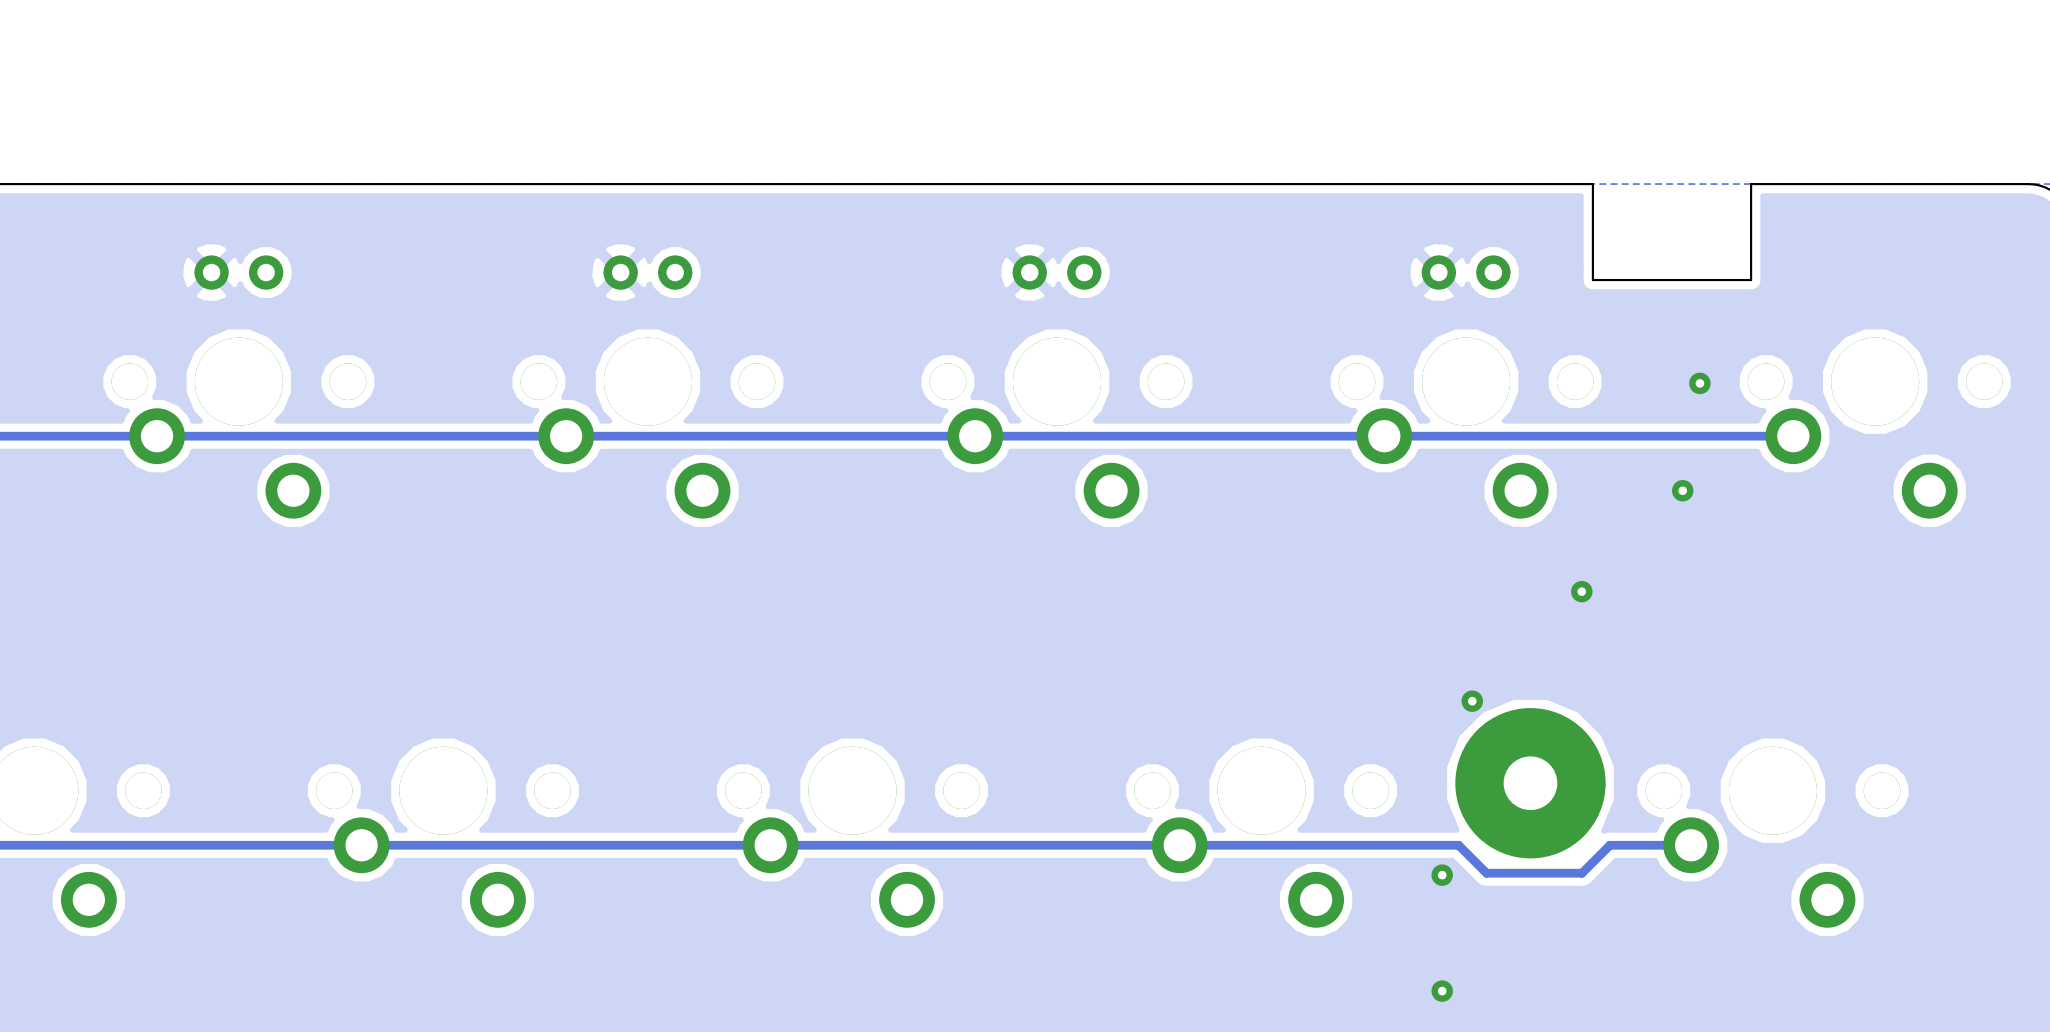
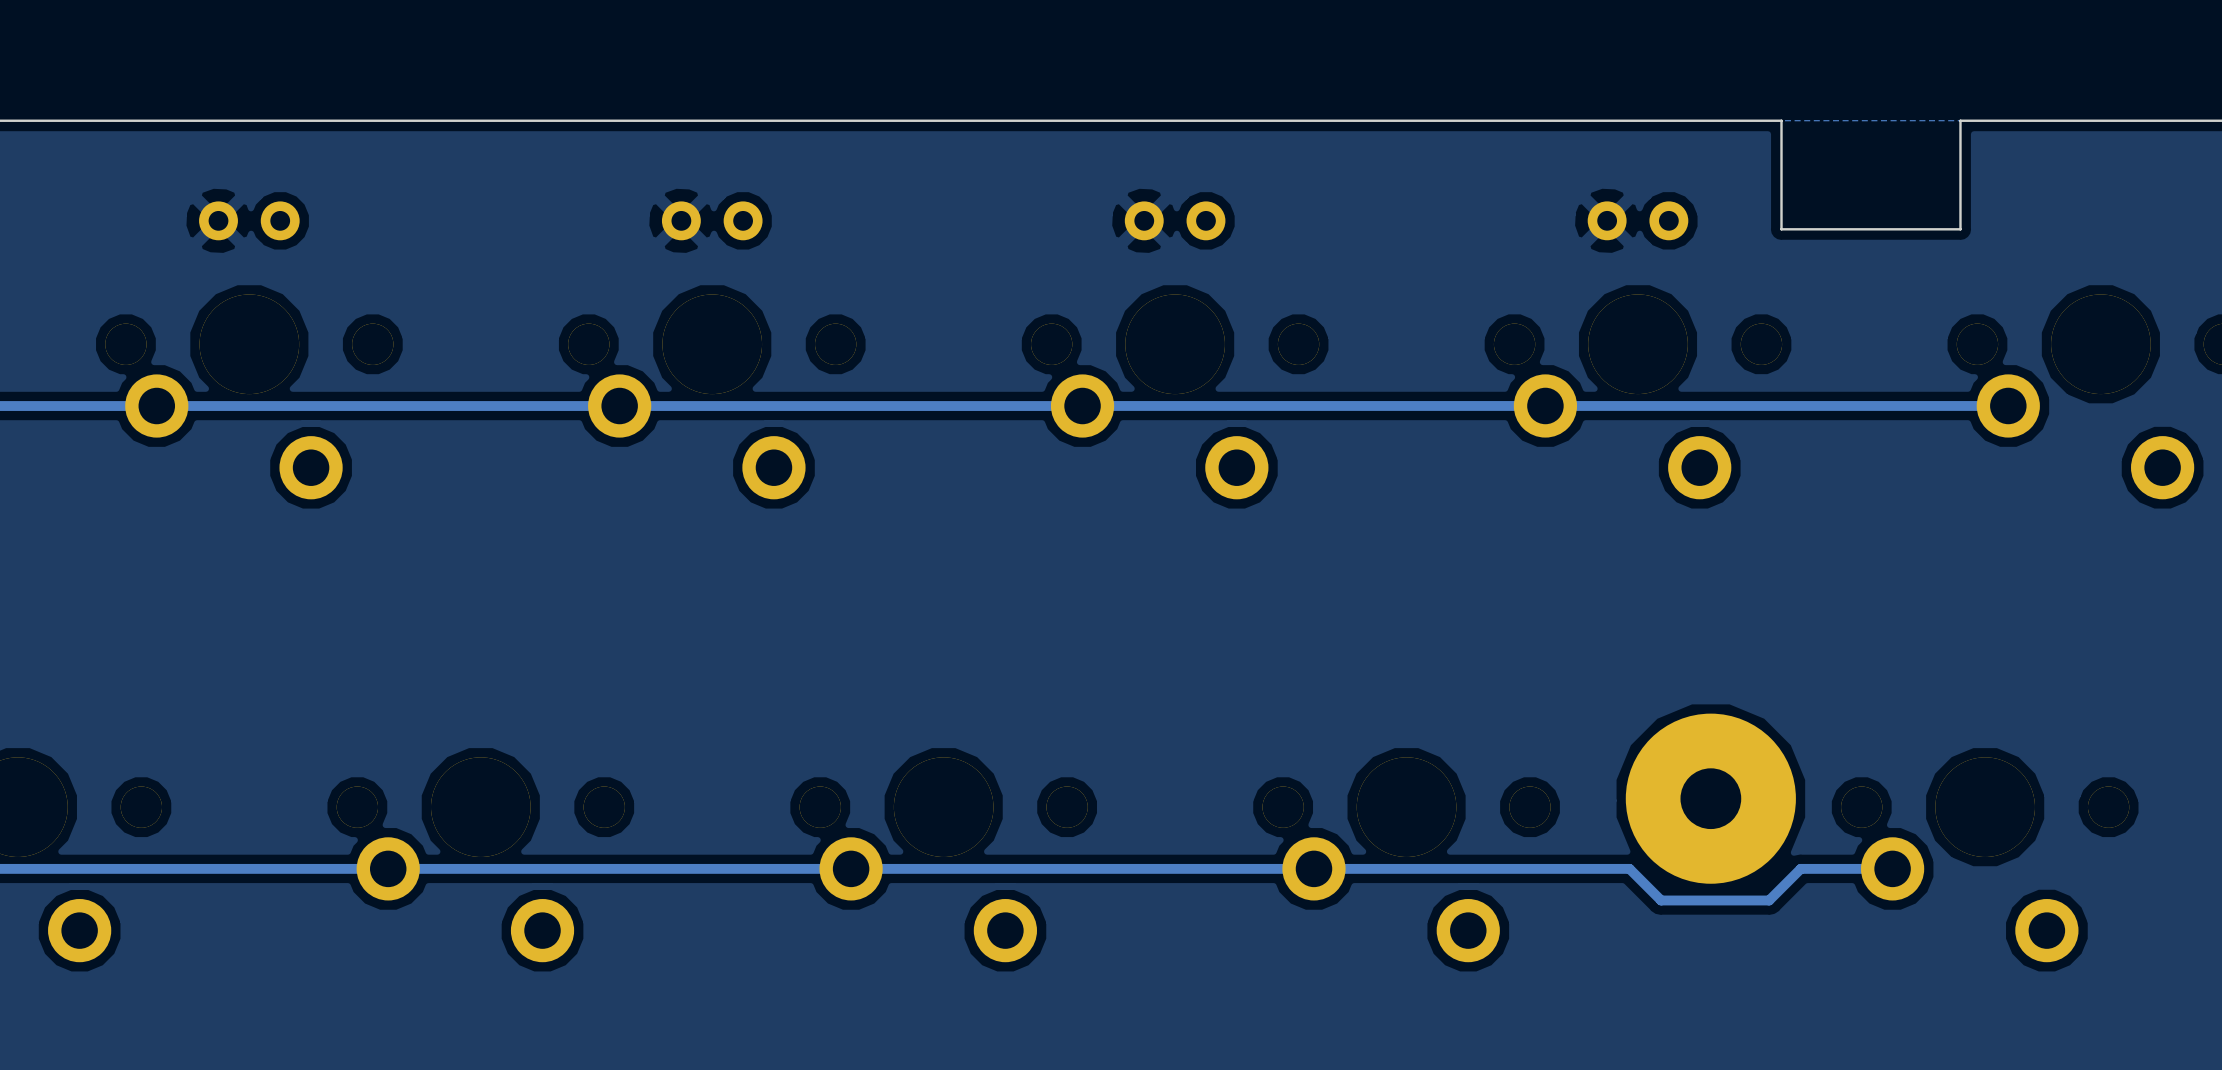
via: (1699, 383) -> none
via: (1682, 490) -> none
via: (1581, 591) -> none
via: (1472, 701) -> none
via: (1442, 875) -> none
via: (1442, 991) -> none

